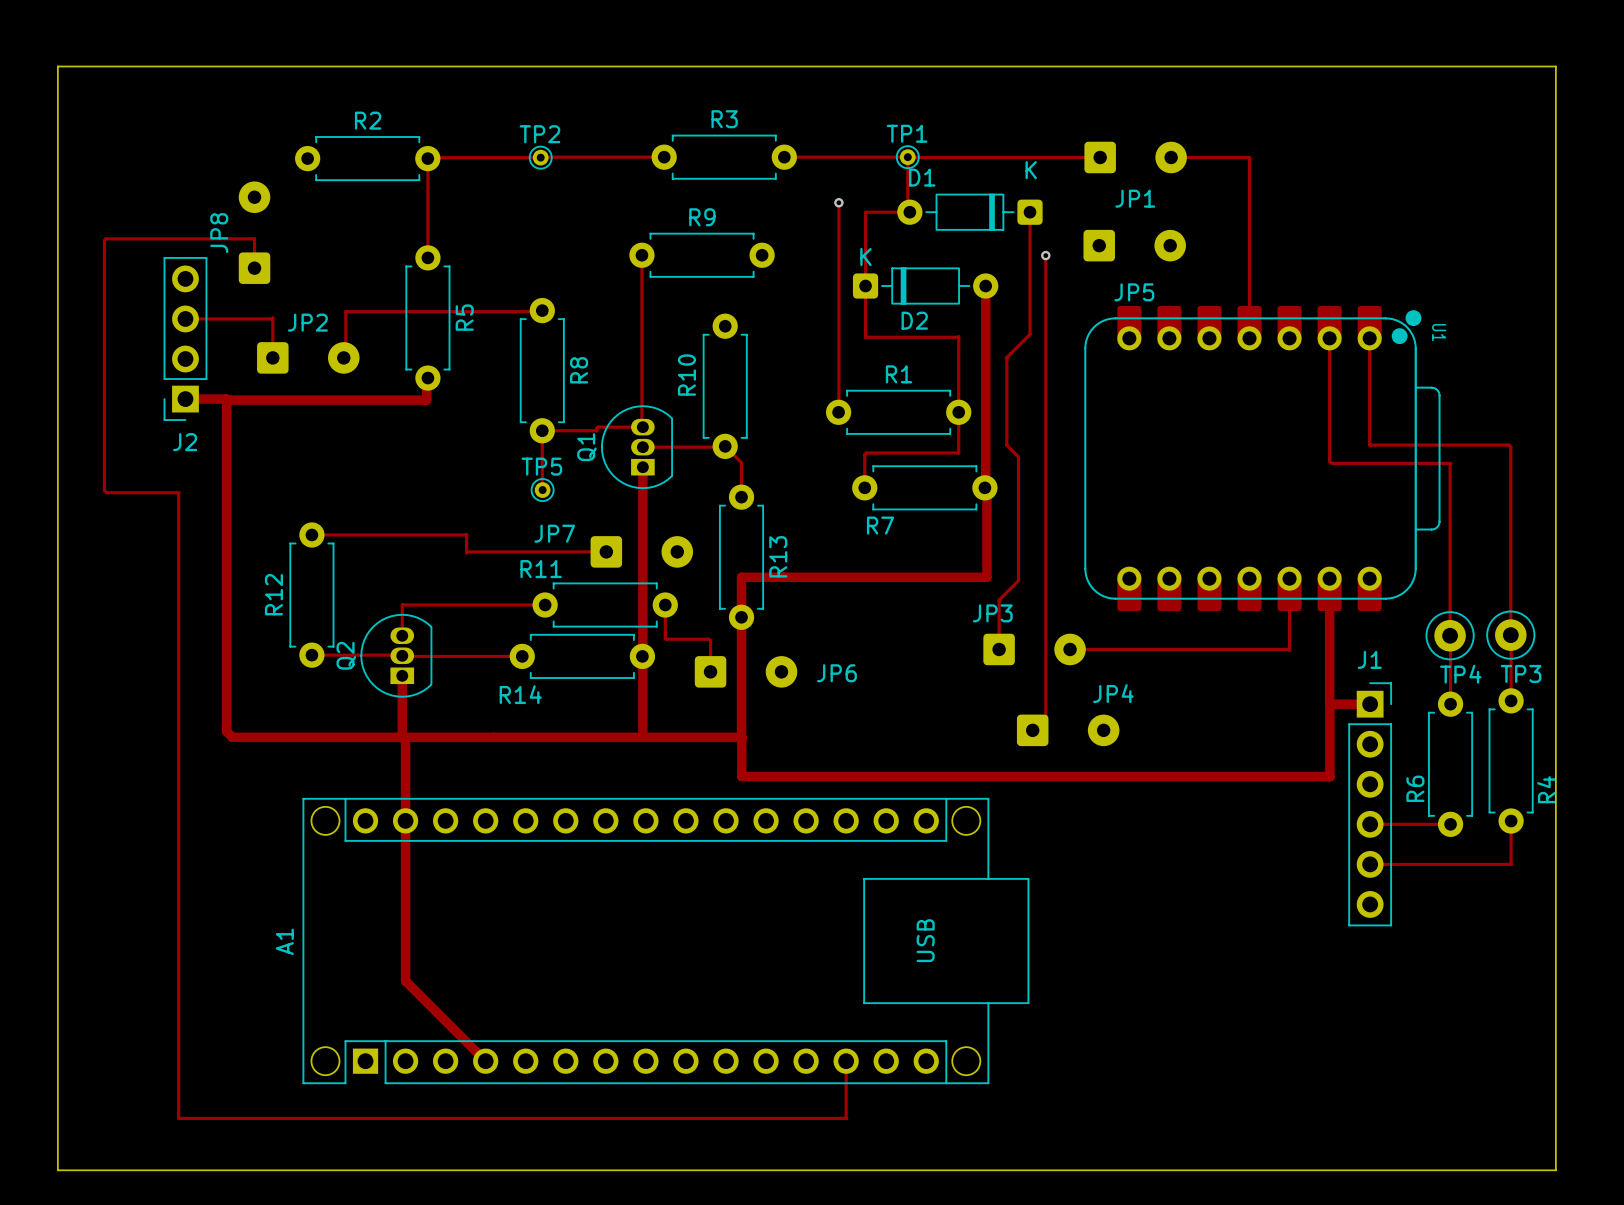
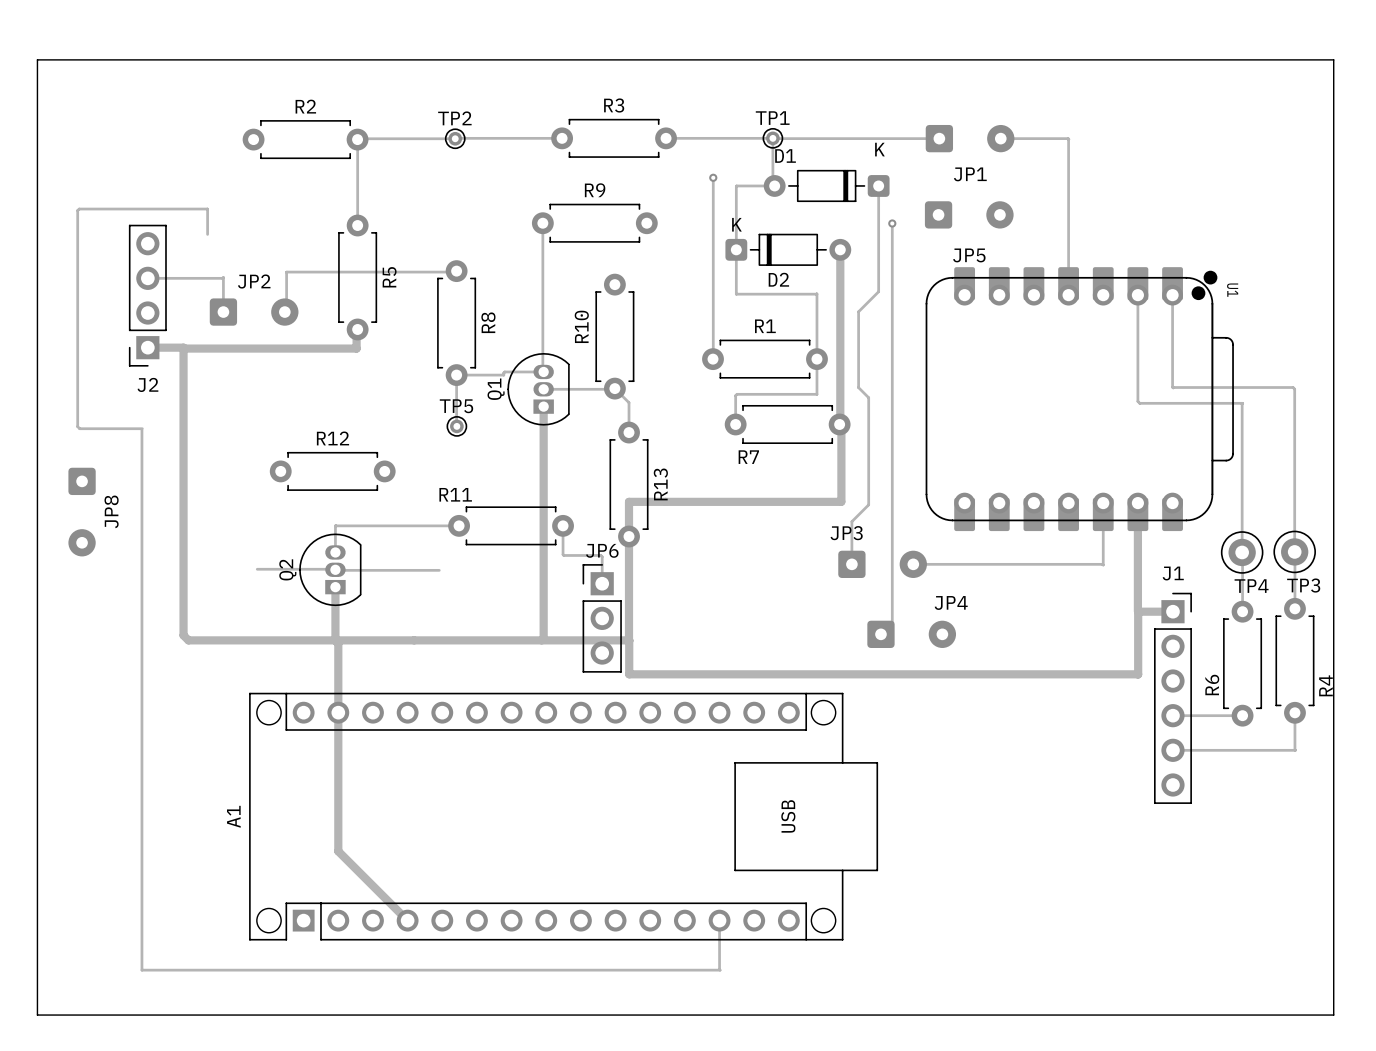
JP8 rotation: 0° (254, 232) -> 180° (82, 512)
JP8 position: (254, 232) -> (82, 512)
track: (311, 534) (466, 534) -> none
track: (466, 534) (466, 552) -> none
track: (606, 551) (466, 552) -> none
JP7: (641, 551) -> none
R12 rotation: 0° (311, 595) -> 90° clockwise (332, 471)
R12 position: (311, 595) -> (332, 471)
R14: (582, 656) -> none
JP6 footprint: [694, 656, 798, 688] -> [582, 564, 622, 673]
JP6 name position: JP6 (836, 673) -> JP6 (602, 550)

